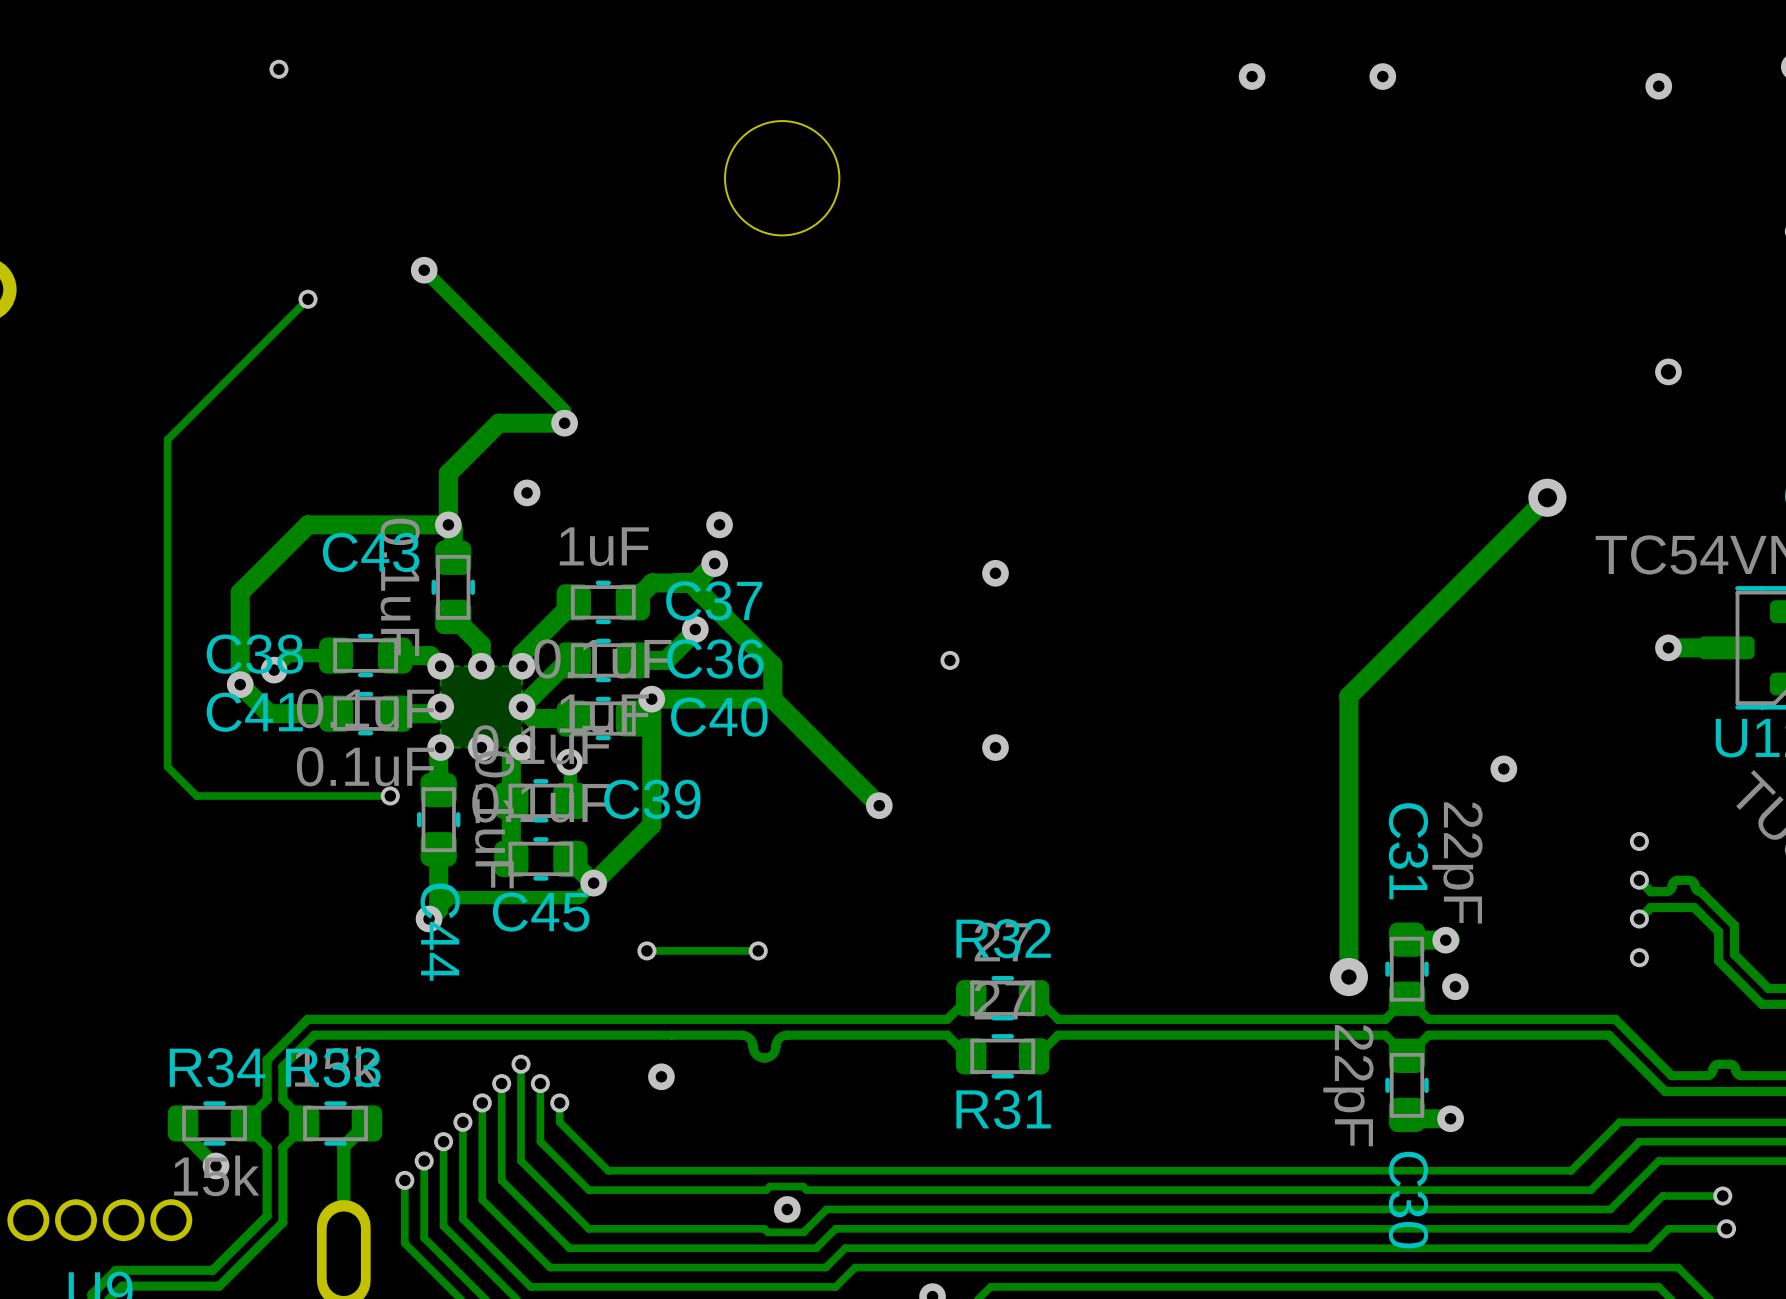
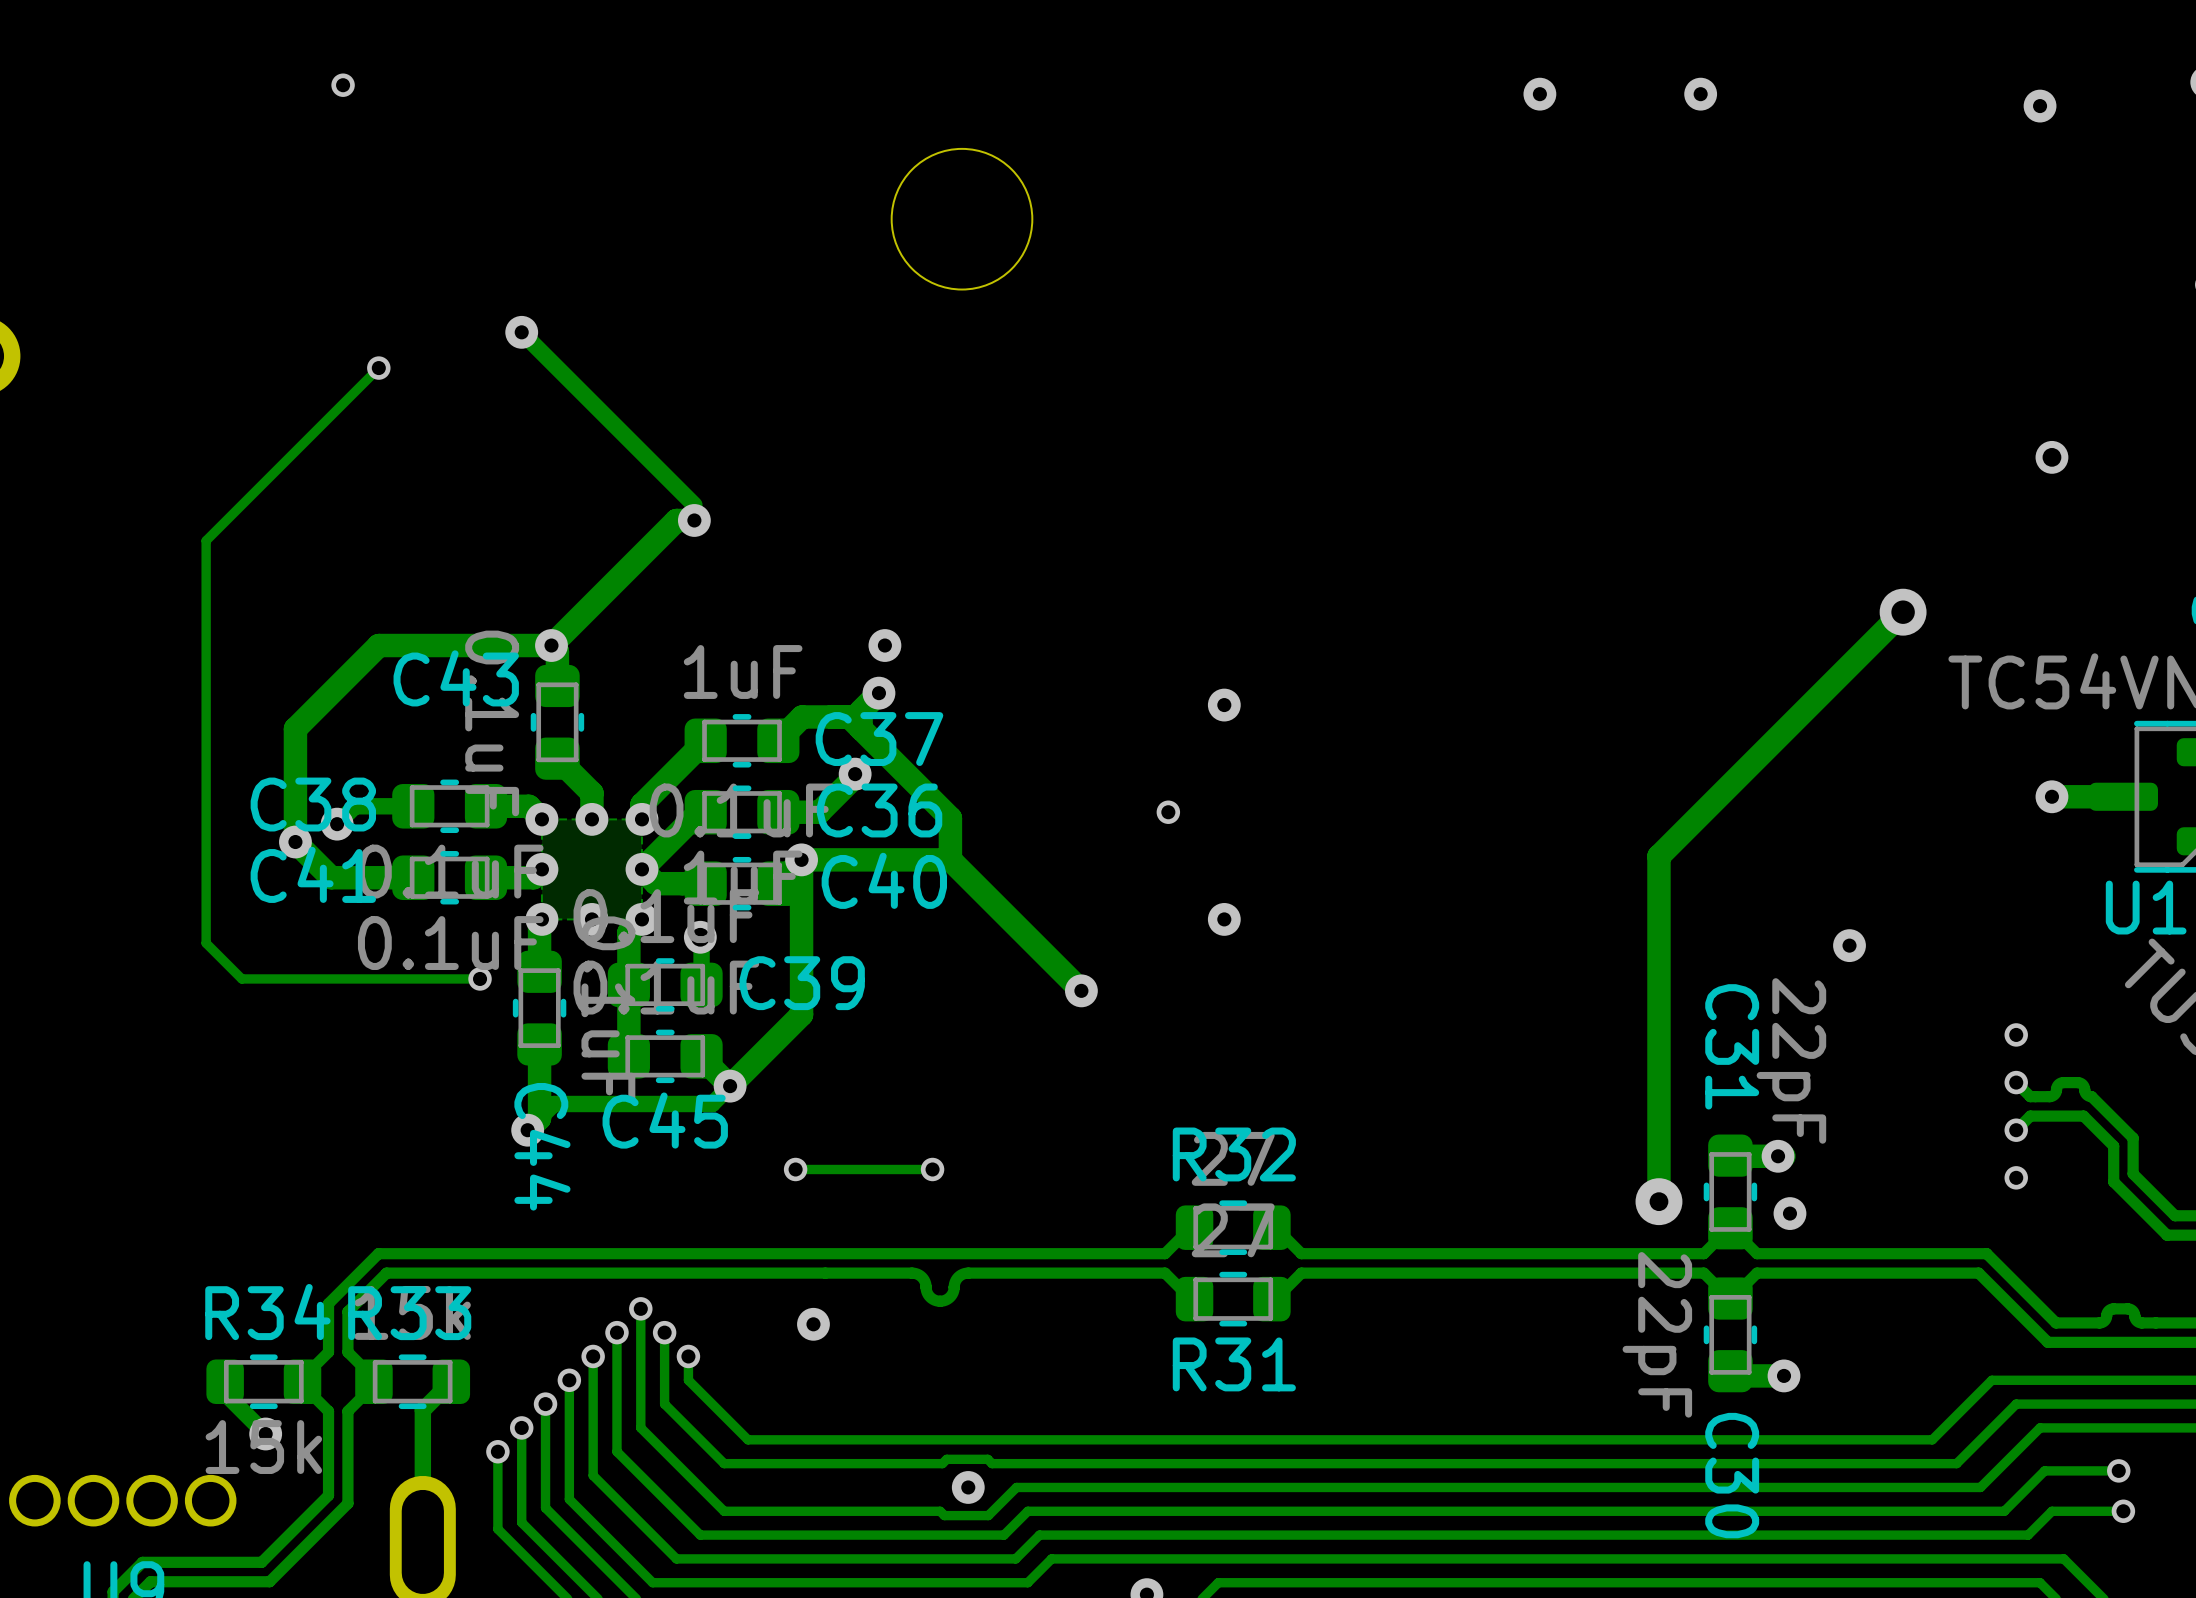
track: (550, 423) (498, 423) (448, 473) (448, 524) -> (676, 520) (551, 645)
via: (527, 492) -> none

